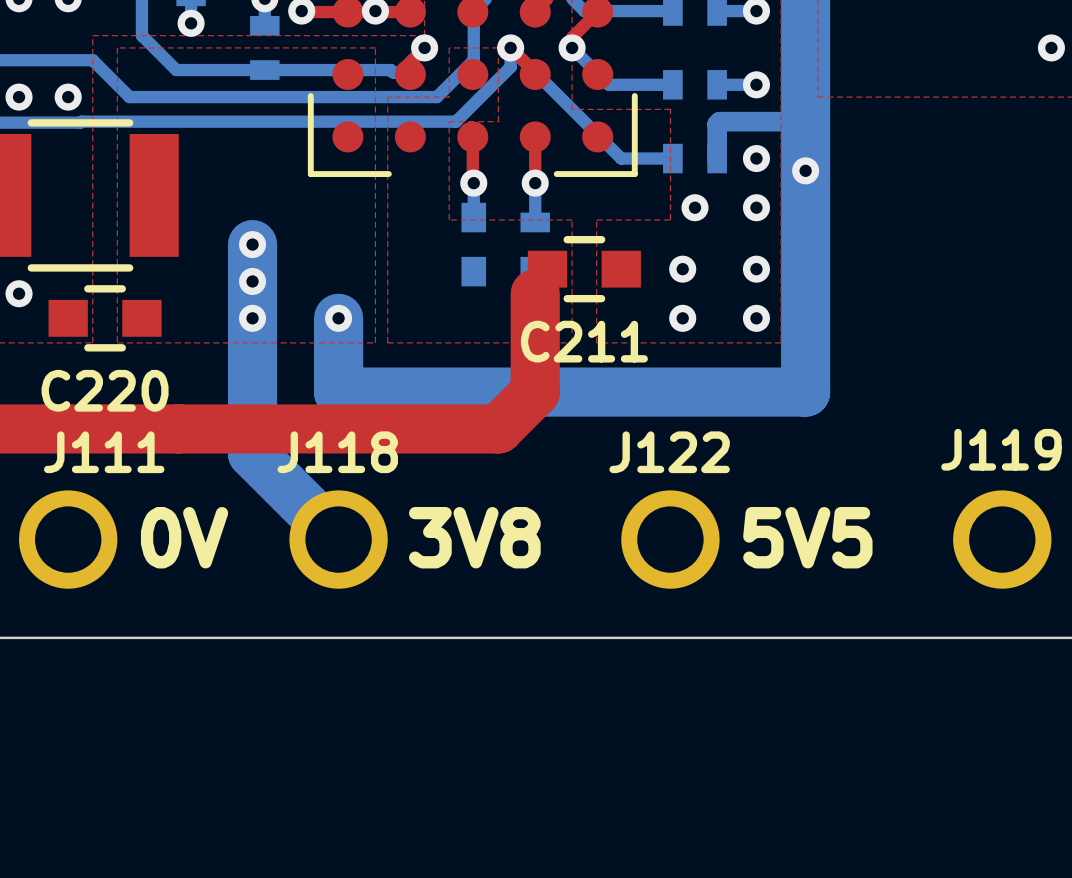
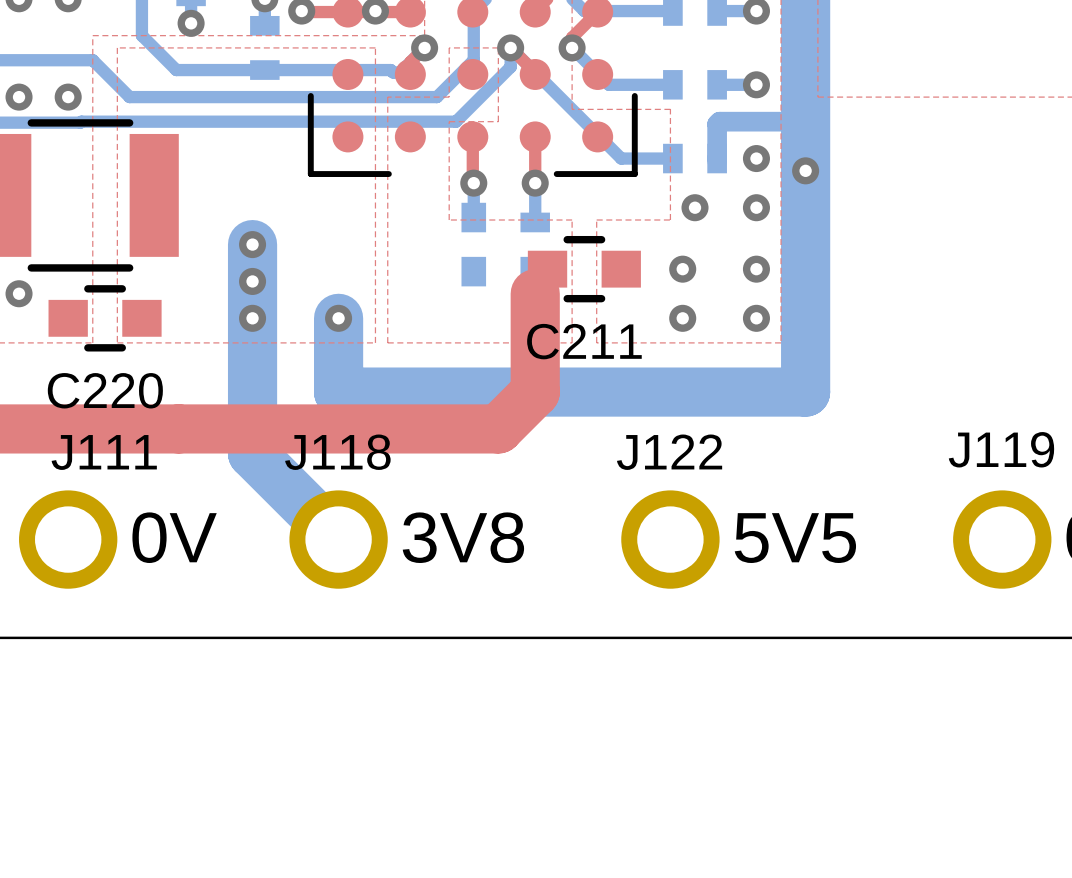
via: (1051, 47) -> none

